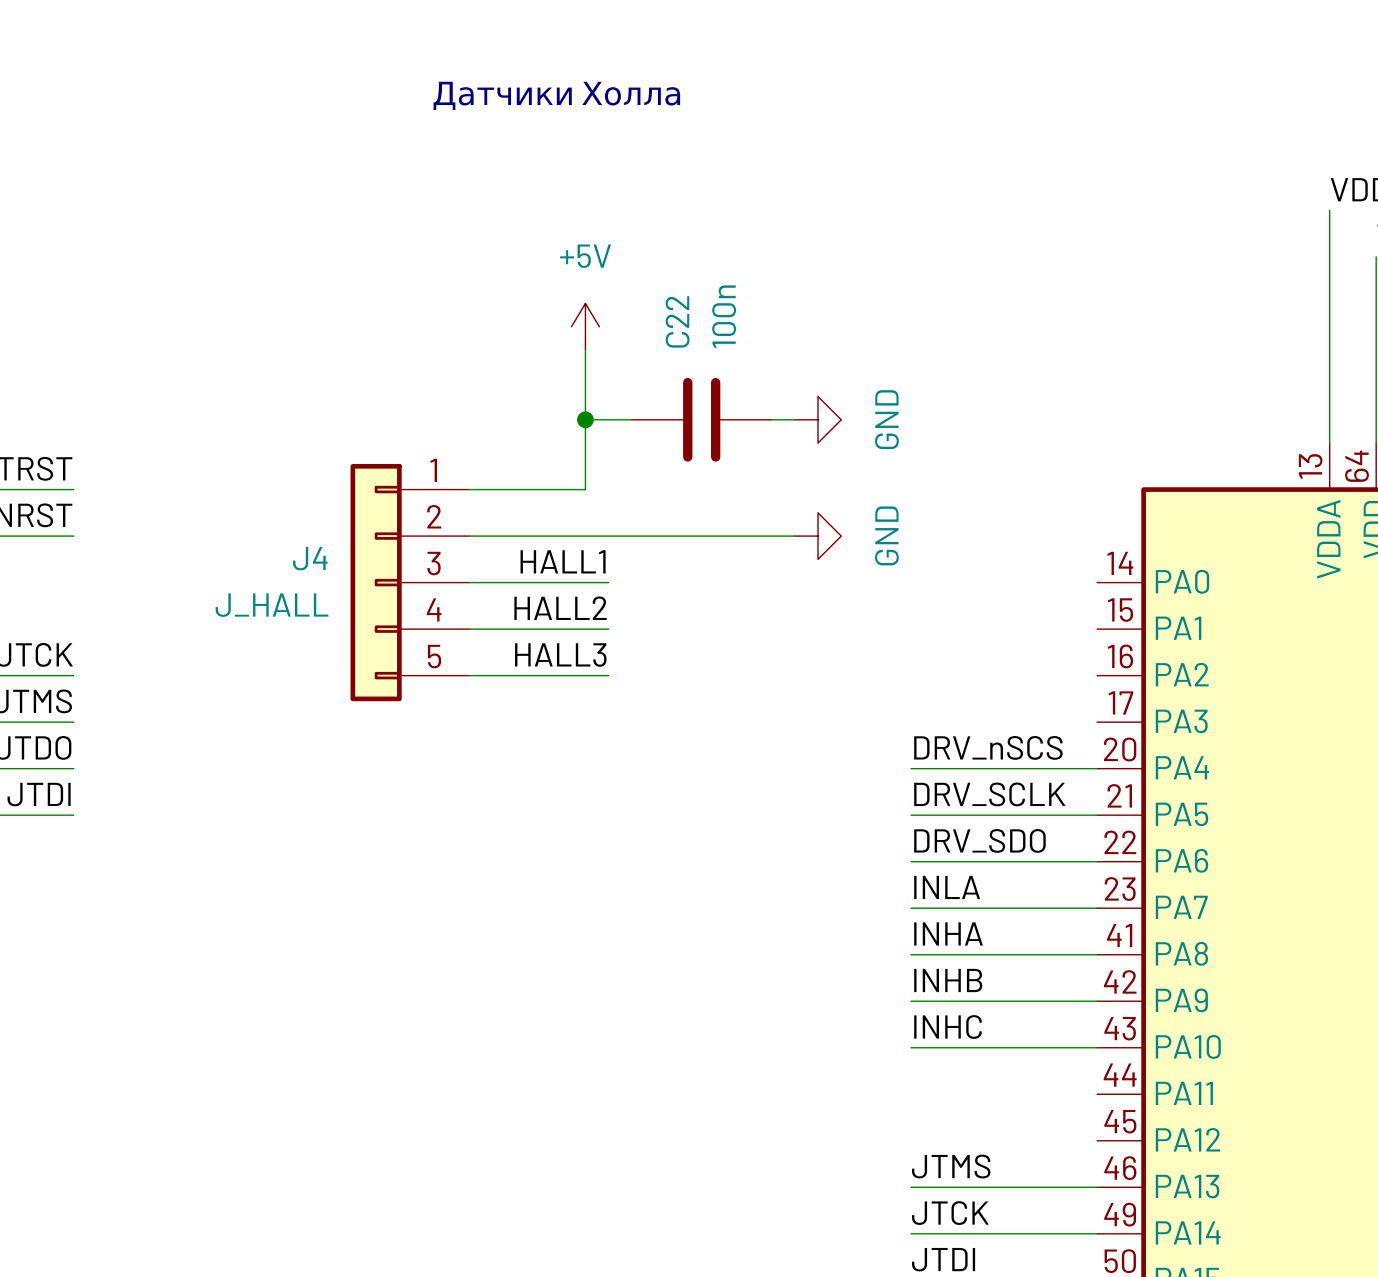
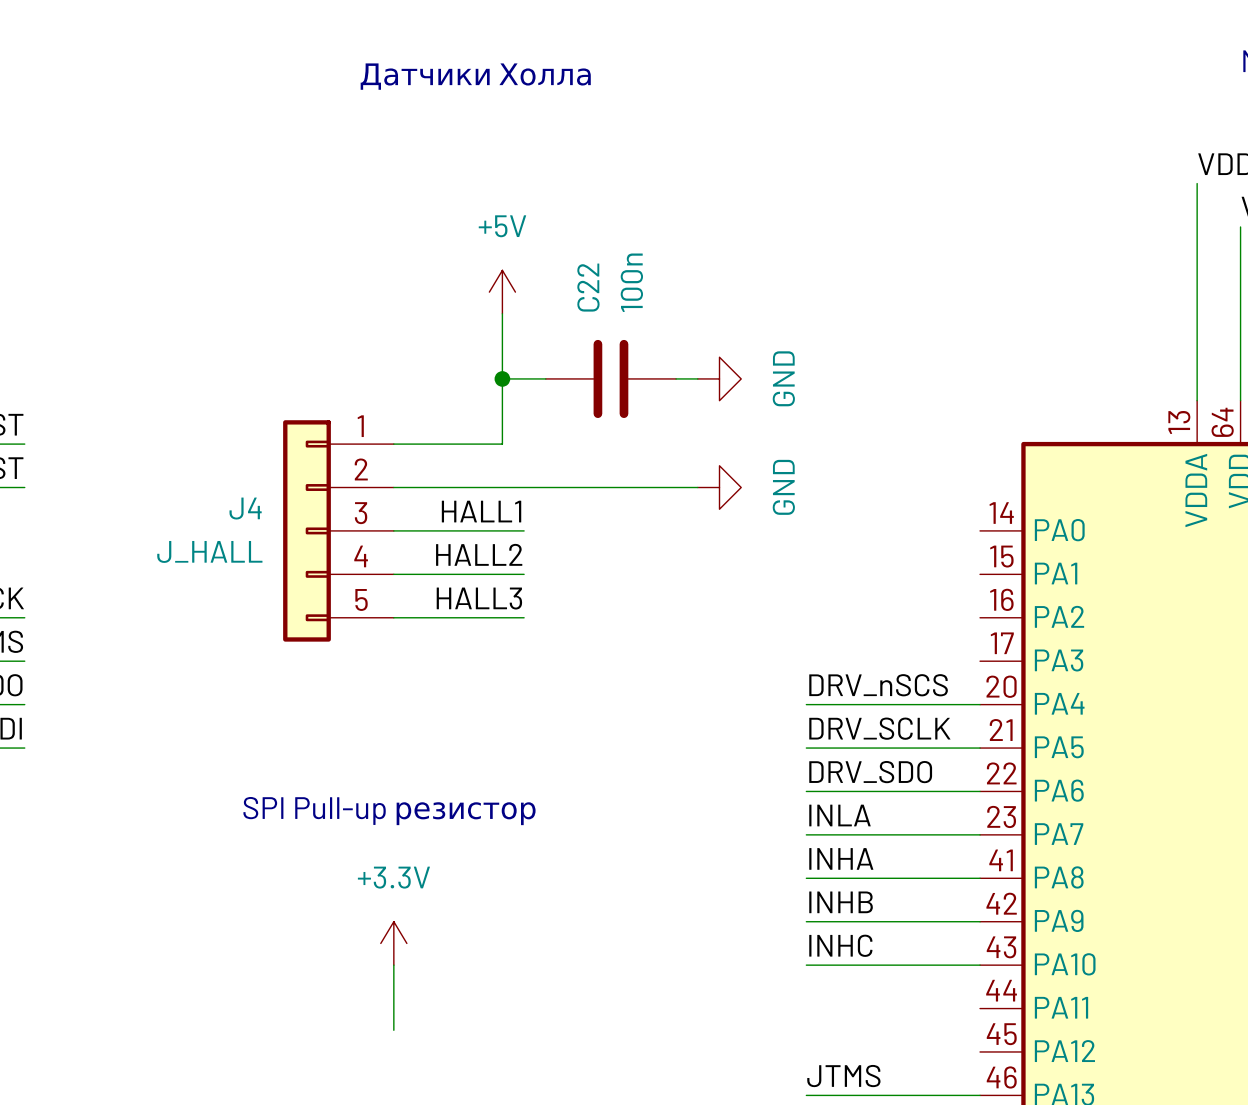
text: none -> SPI Pull-up резистор (389, 811)
power symbol: none -> +3.3V (393, 943)
wire: none -> (393, 965) (393, 1030)

